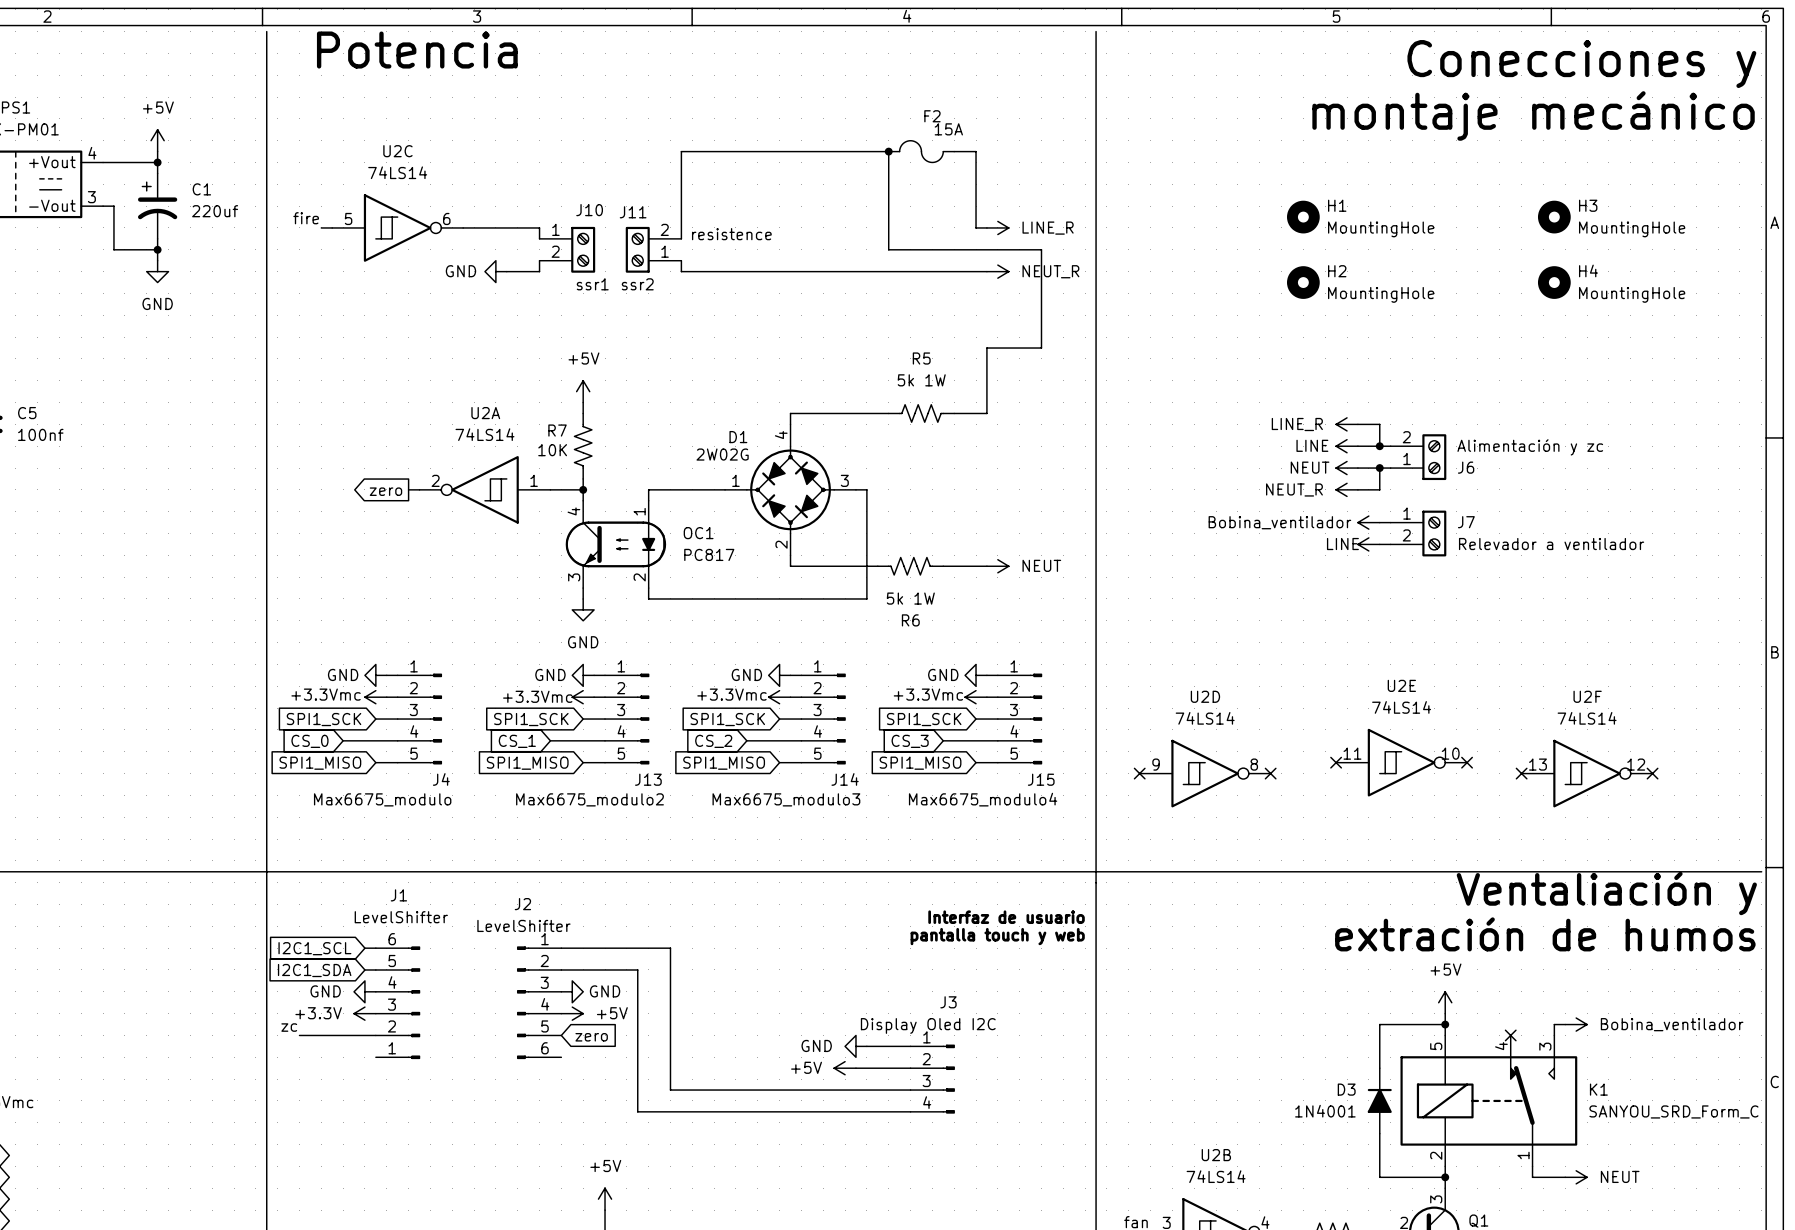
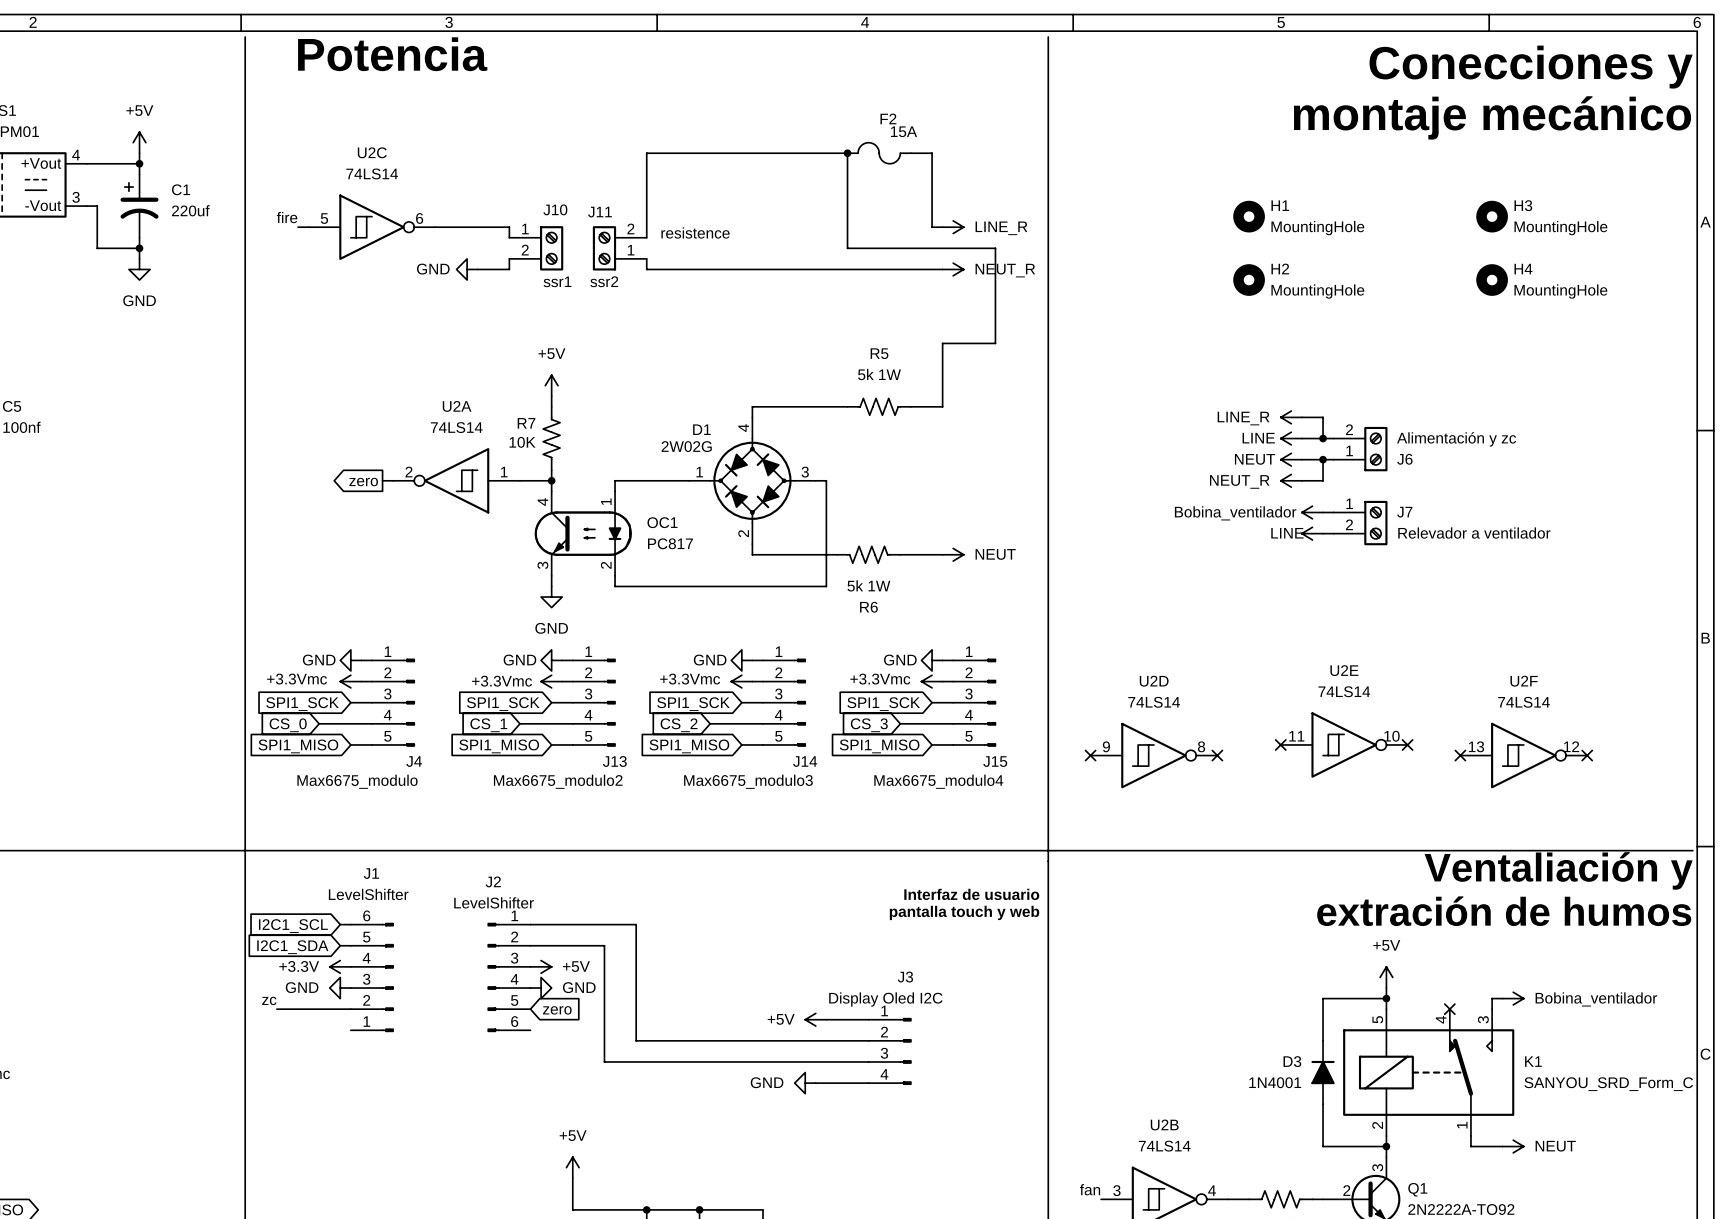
power symbol: GND (364, 991) -> +3.3V (340, 966)
power symbol: GND (572, 991) -> +5V (541, 966)
power symbol: +3.3V (364, 1013) -> GND (340, 988)
power symbol: +5V (572, 1013) -> GND (541, 988)
power symbol: GND (855, 1046) -> +5V (815, 1019)
wire: (670, 1068) (670, 1090) -> (604, 1061) (636, 1061)
wire: none -> (636, 1040) (815, 1040)
power symbol: +5V (845, 1068) -> none
wire: (637, 1090) (637, 1111) (855, 1111) -> none
power symbol: none -> GND (805, 1083)

